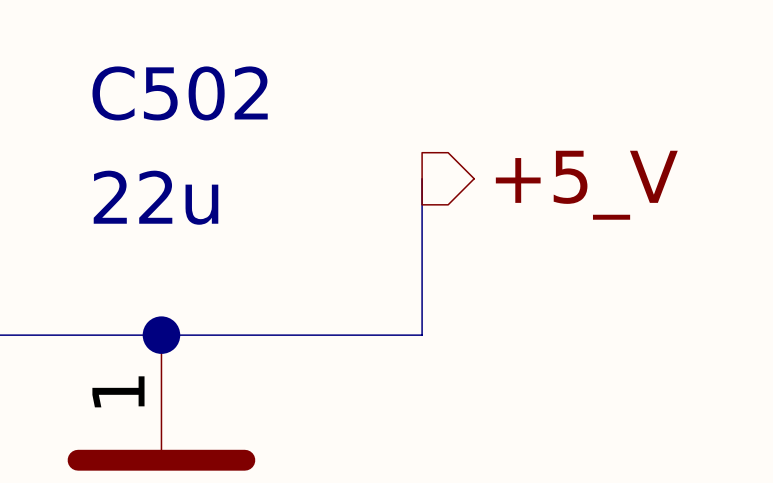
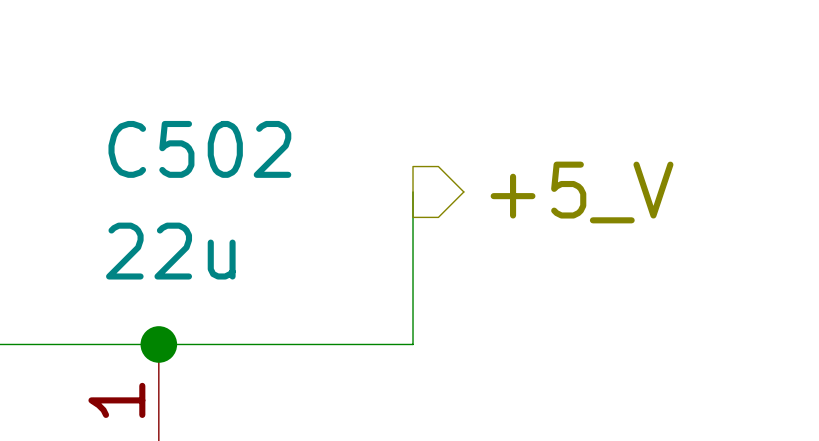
C502 name position: C502 (180, 93) -> C502 (199, 149)
C502 value position: 22u (156, 197) -> 22u (170, 251)

